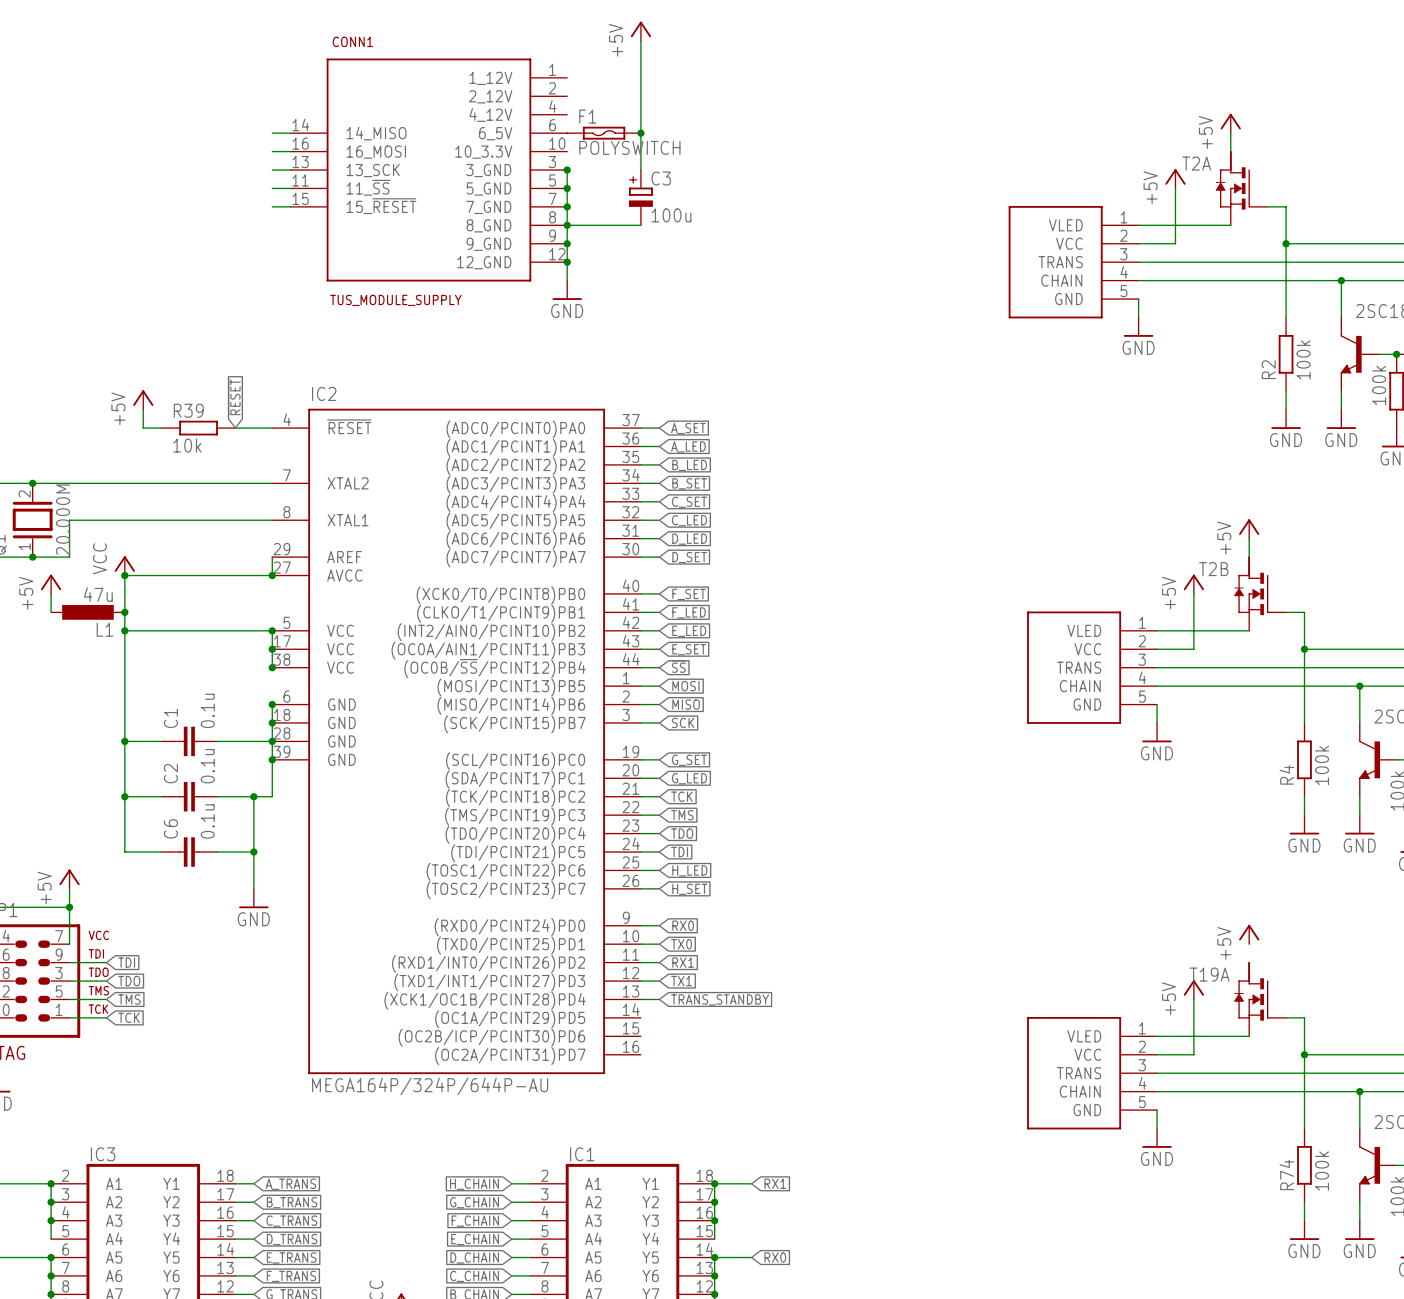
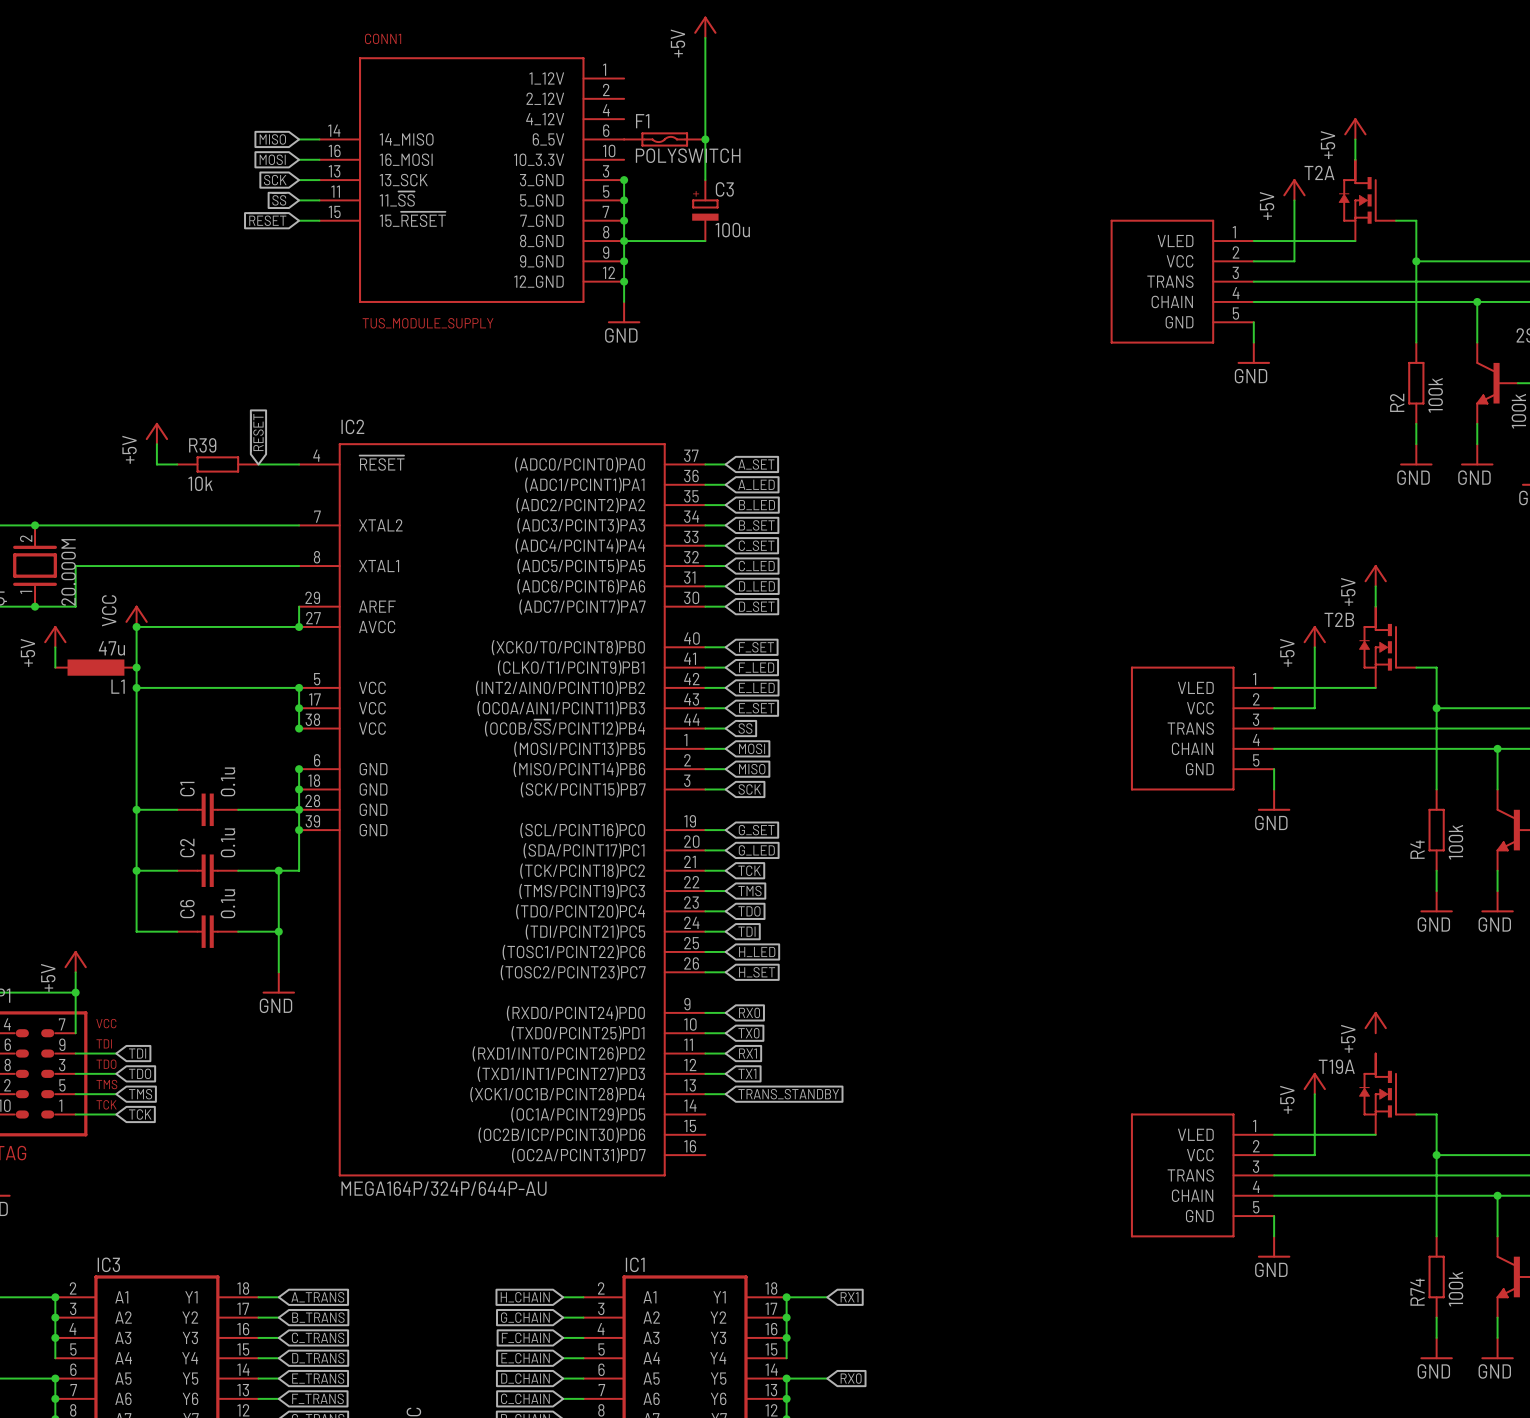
global label: none -> MISO (272, 139)
global label: none -> MOSI (272, 159)
global label: none -> SCK (275, 180)
global label: none -> ~{SS} (279, 199)
global label: none -> ~{RESET} (267, 219)

